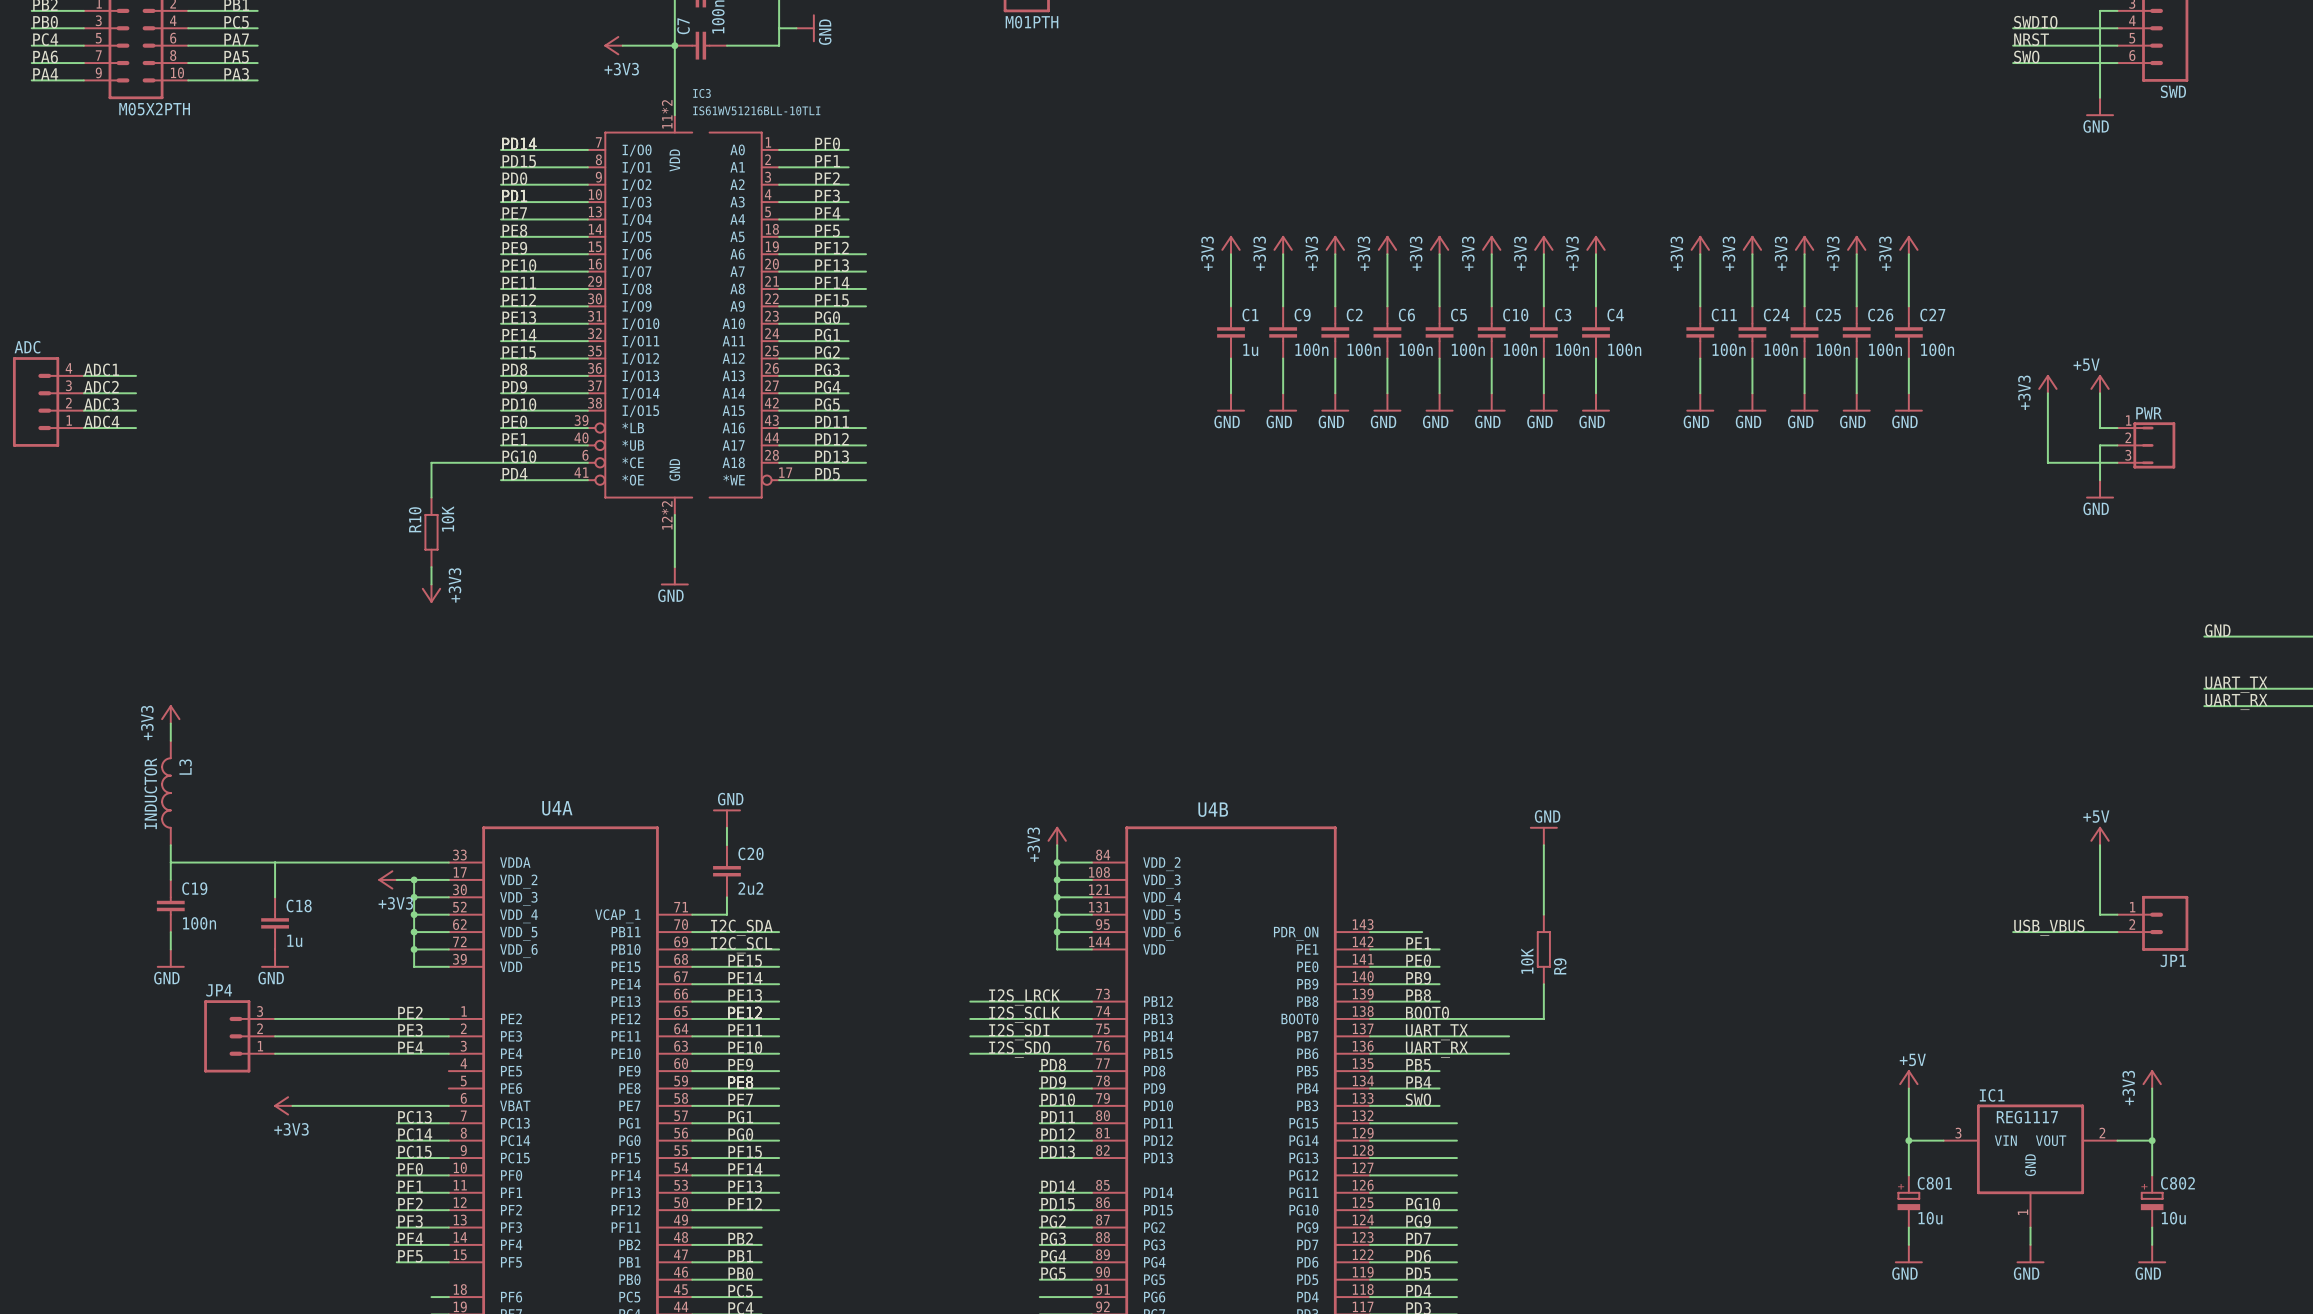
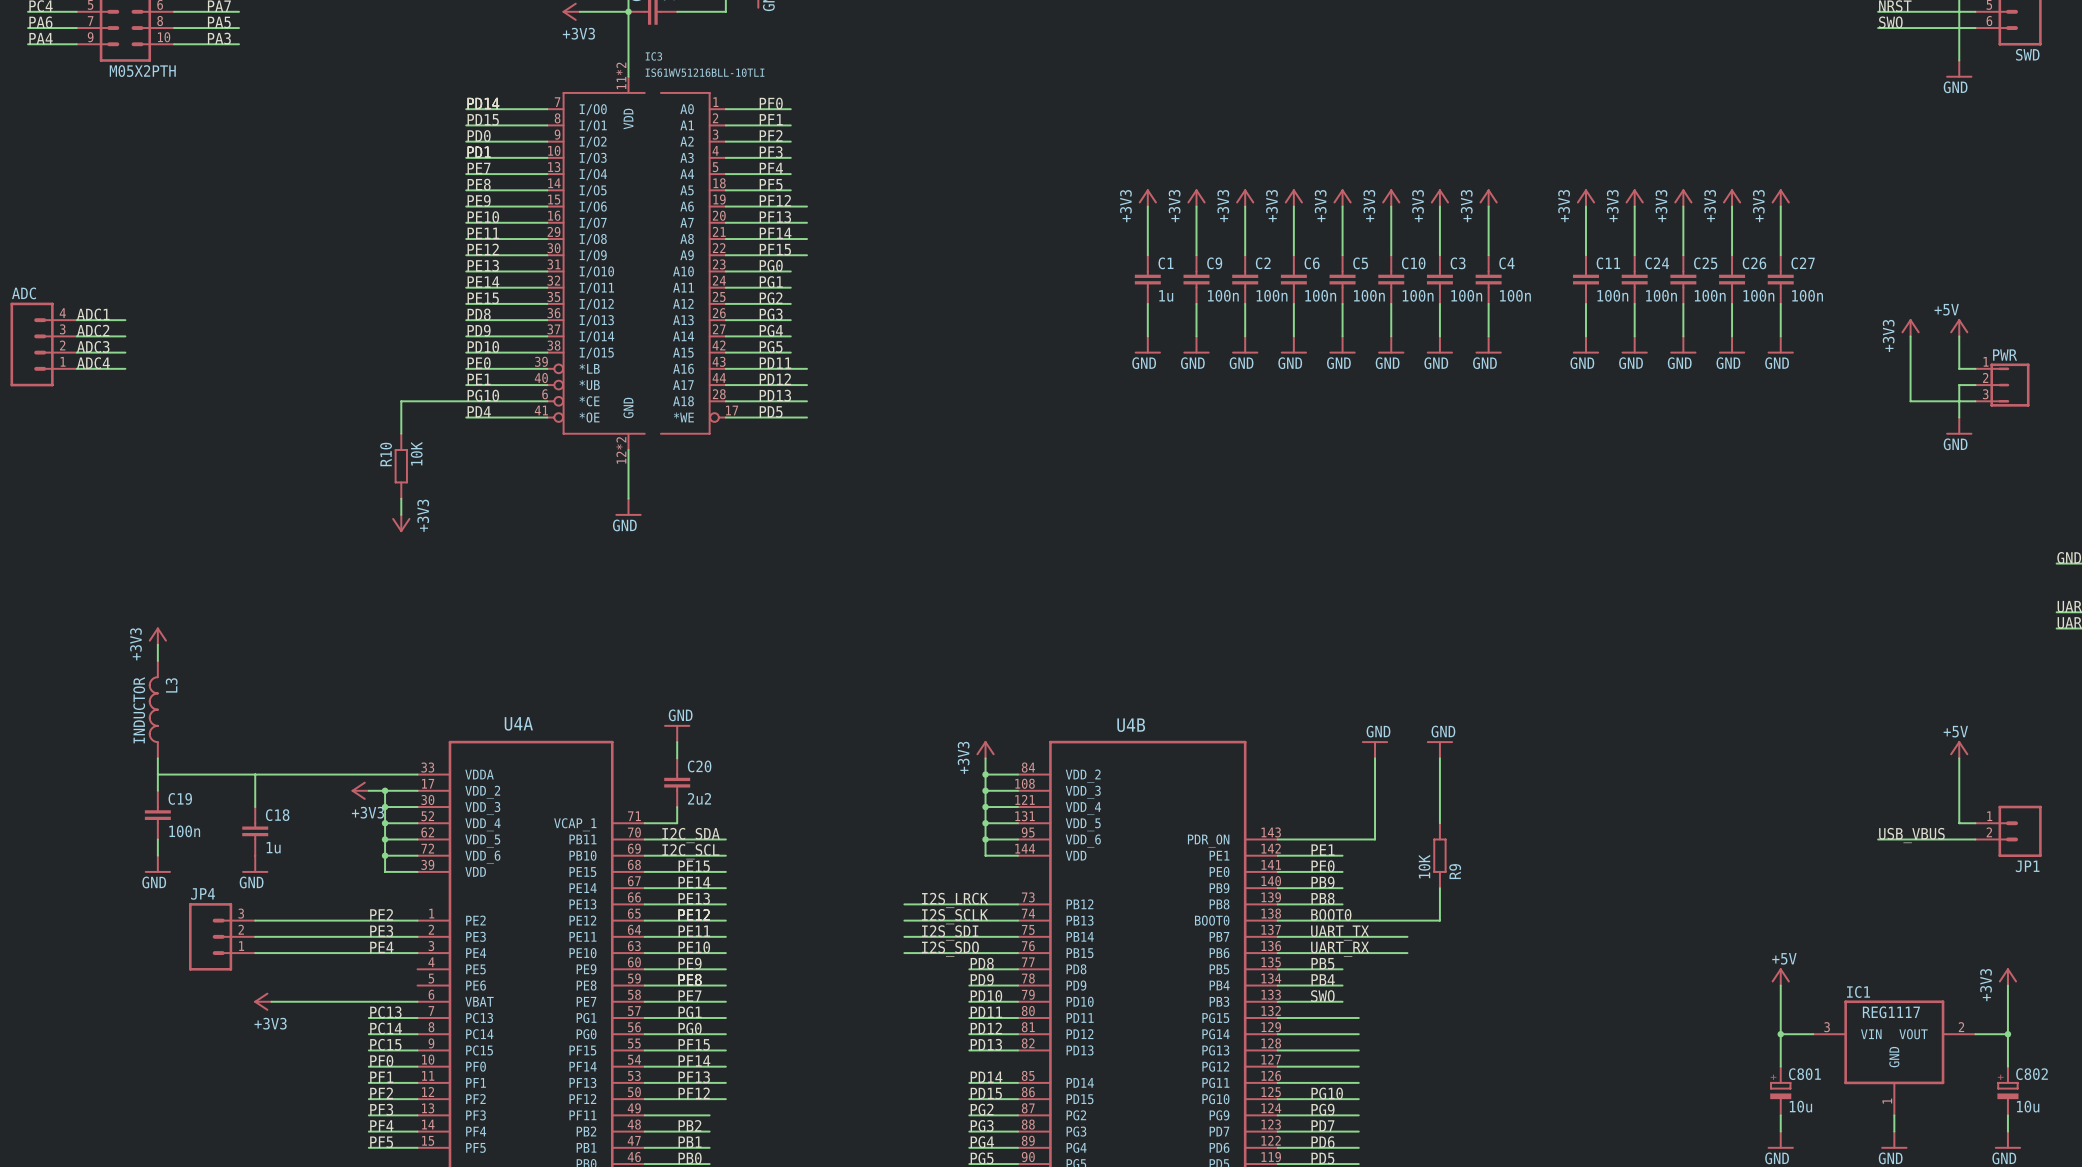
power symbol: none -> GND (1375, 749)
wire: none -> (1375, 758) (1375, 839) (1326, 839)

